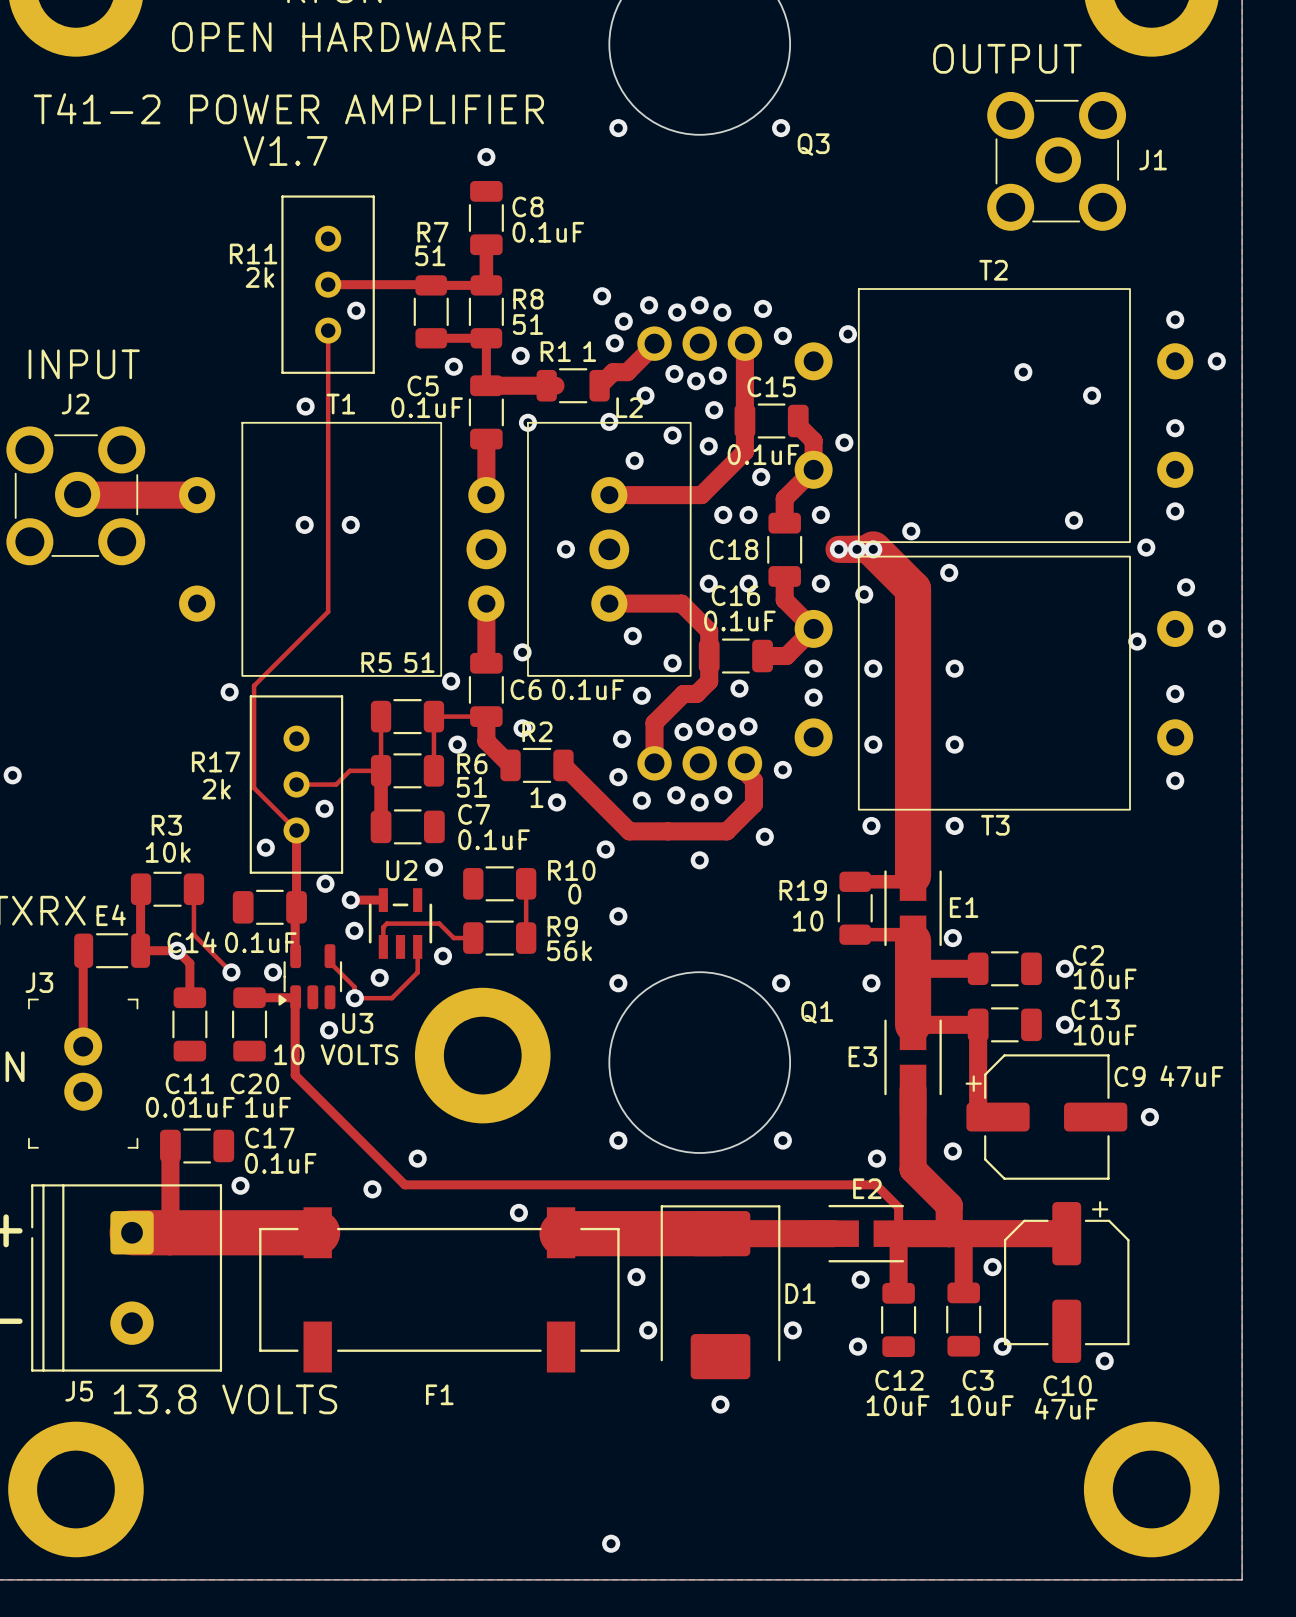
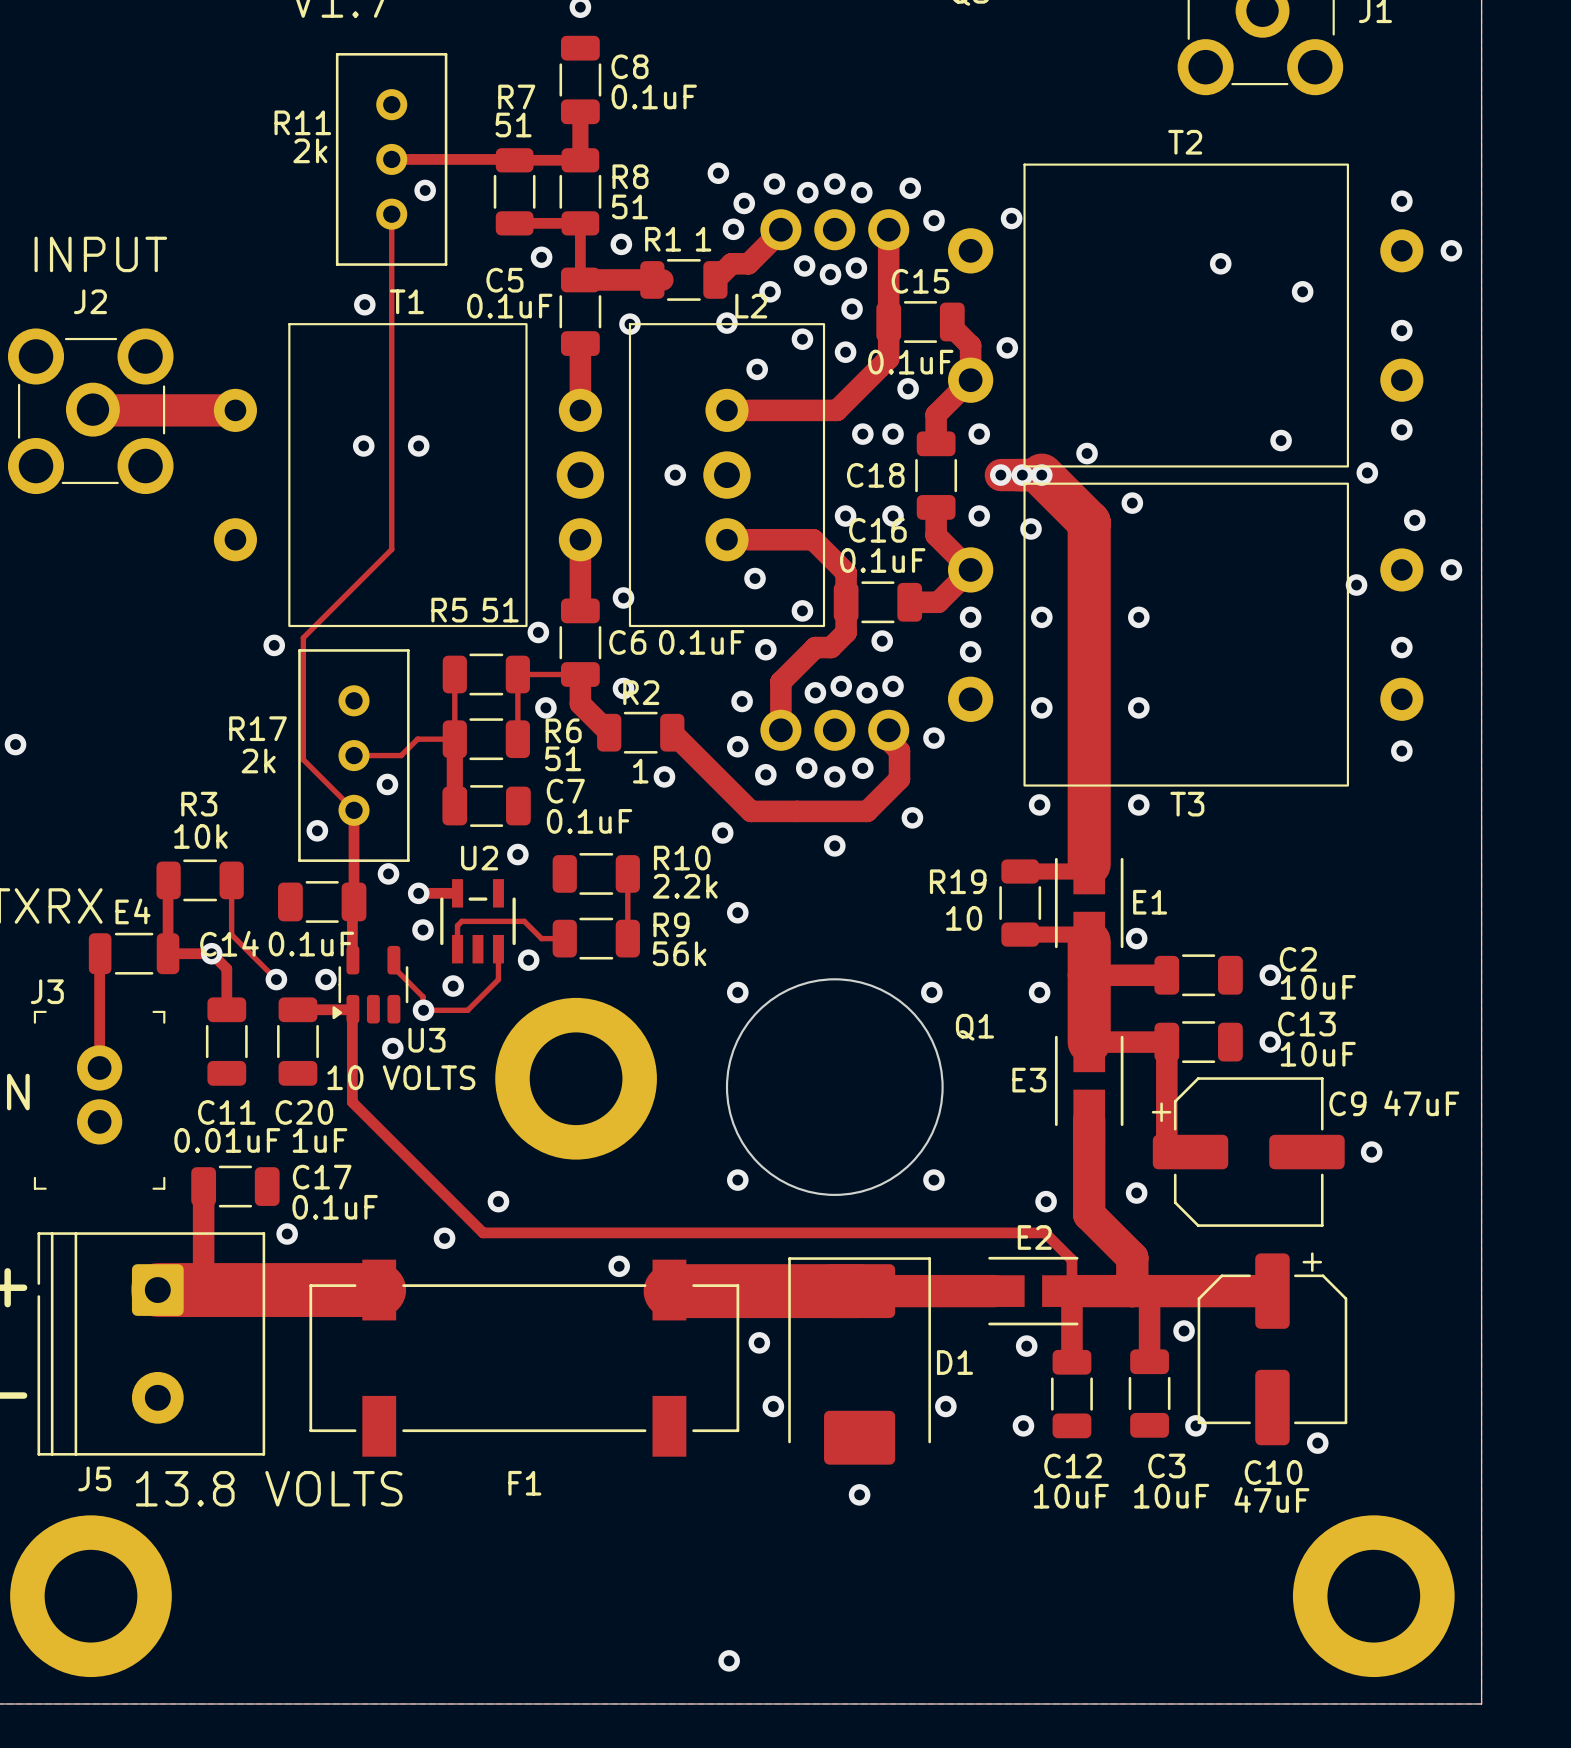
R10 value: 0 (574, 894) -> 2.2k (685, 886)

